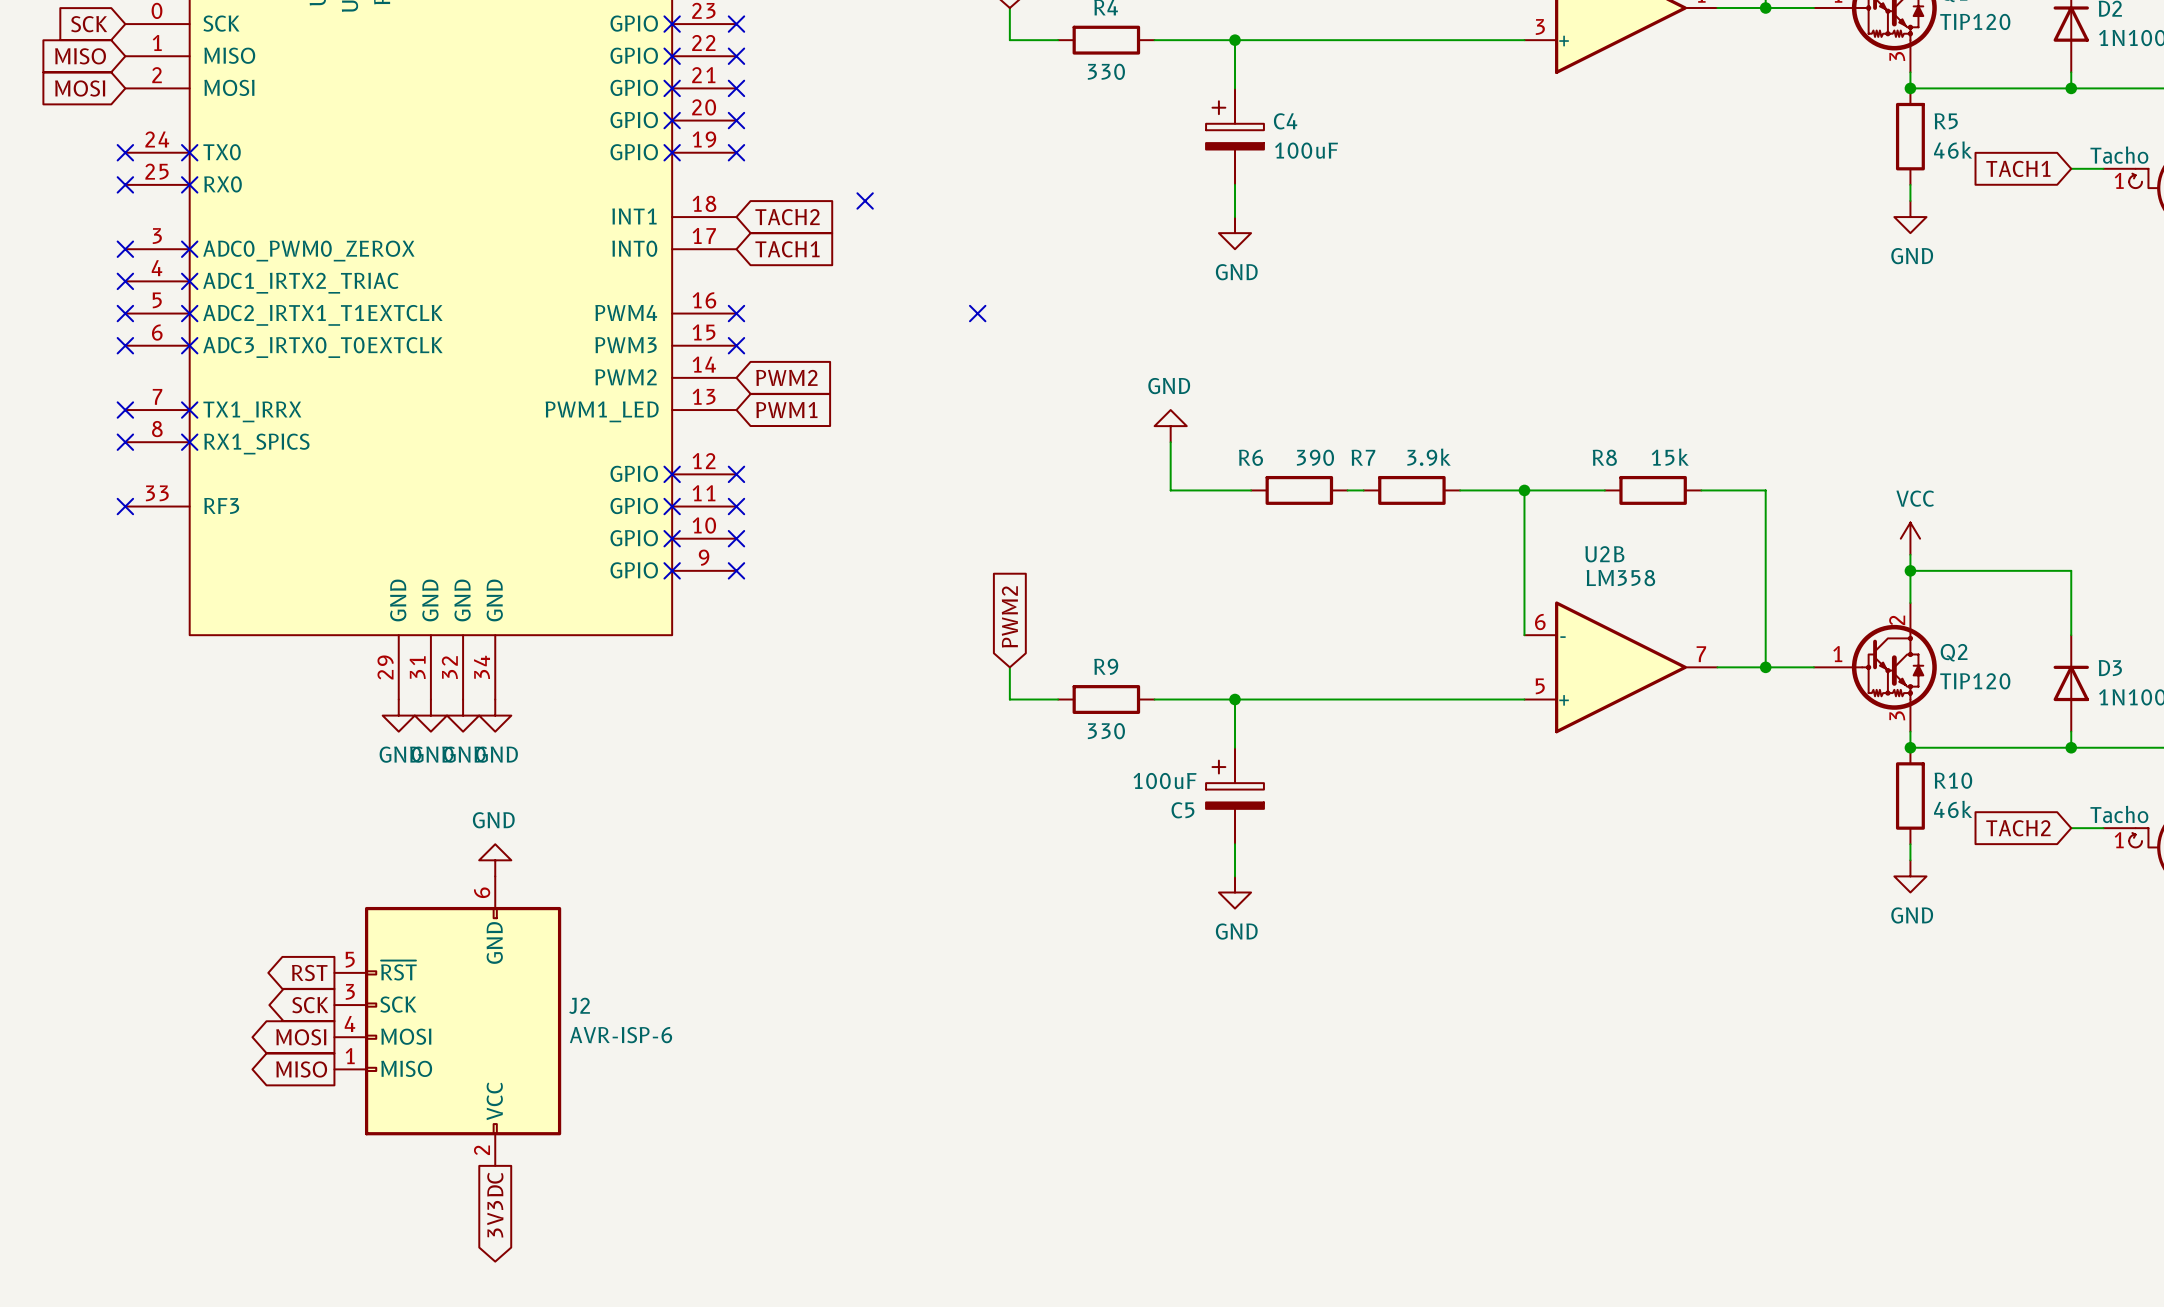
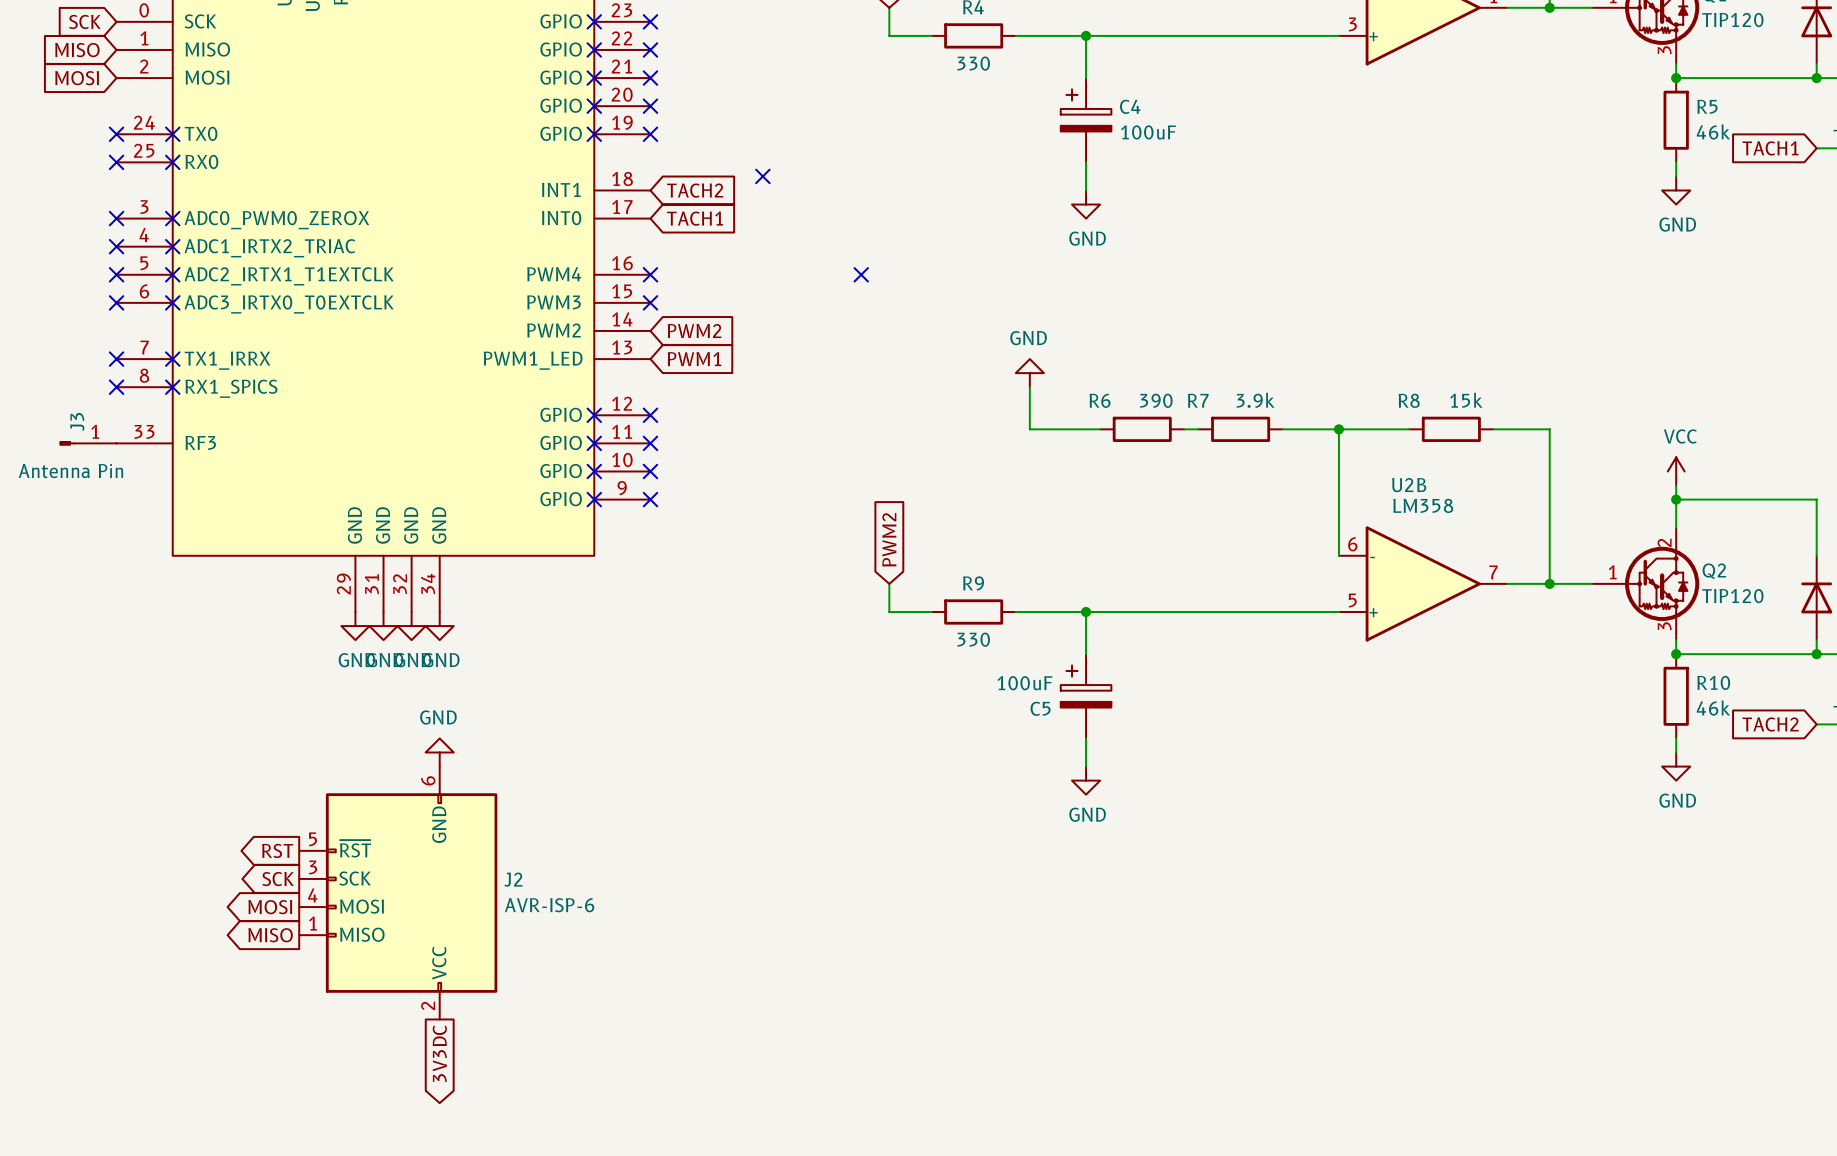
J3: none -> Antenna Pin (88, 443)
no-connect mark: (125, 506) -> none

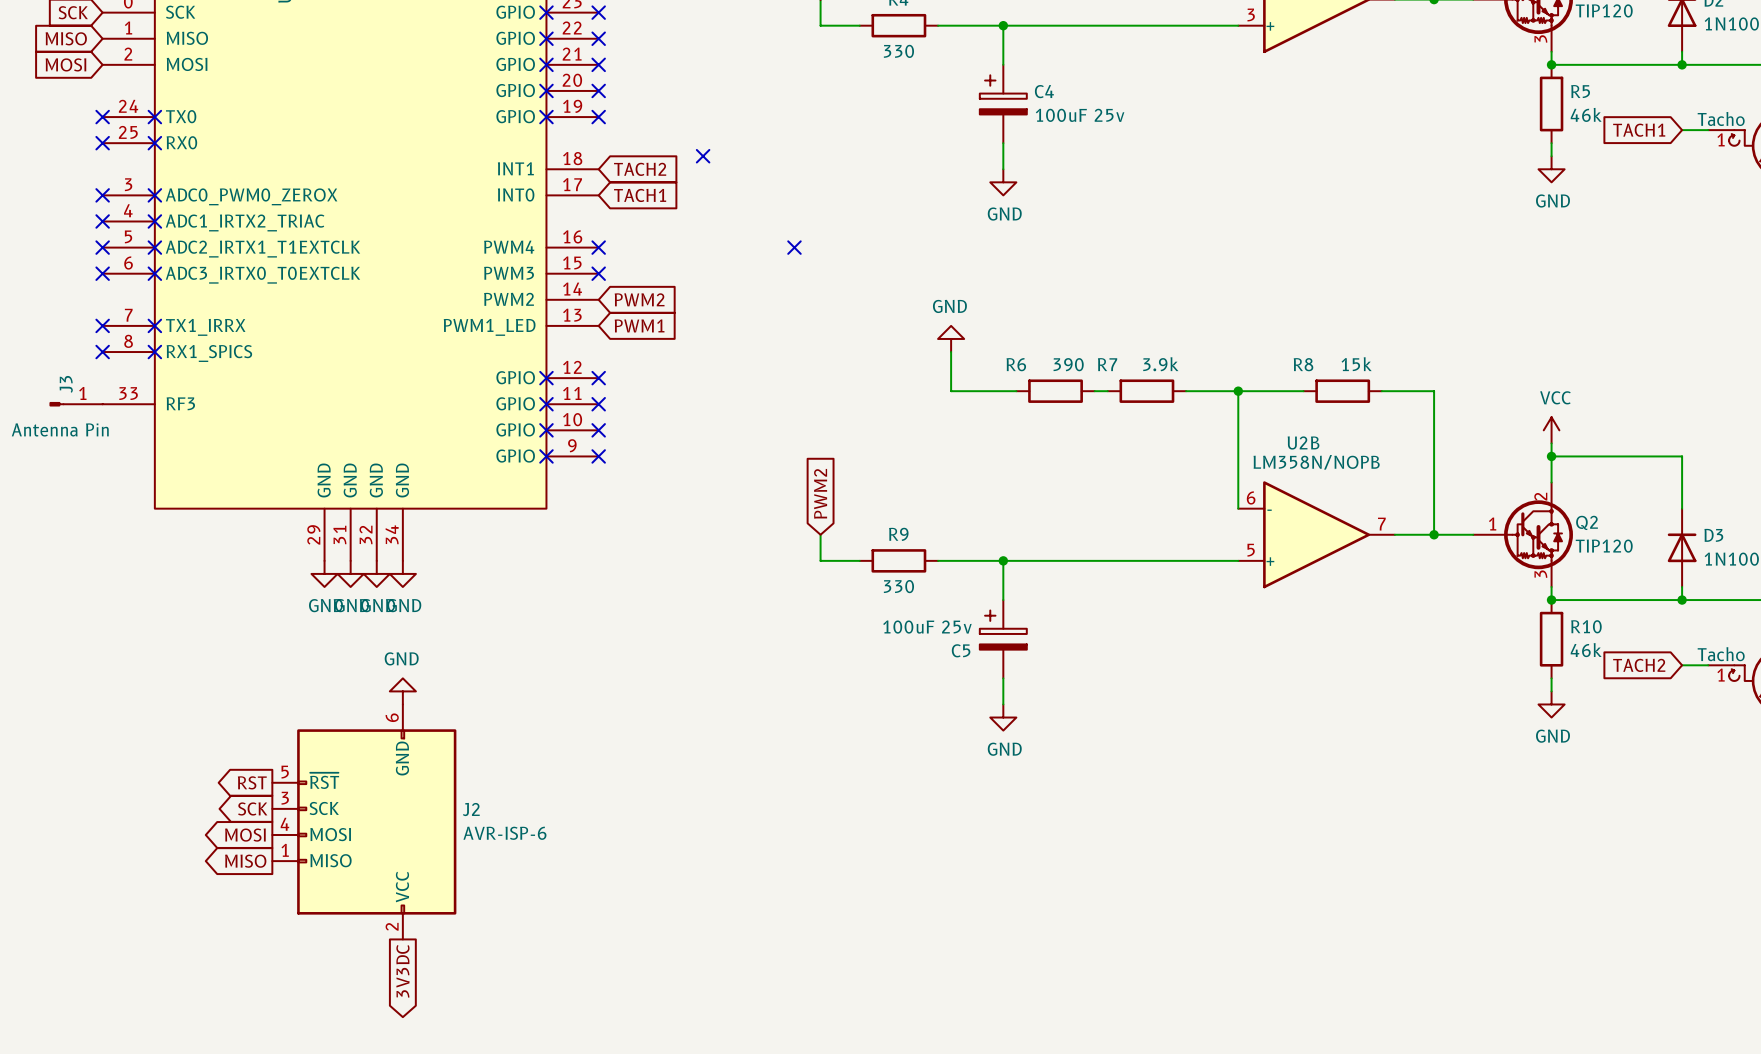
C4 value: 100uF (1148, 132) -> 100uF 25v (1080, 115)
U2B value: LM358 (1423, 505) -> LM358N/NOPB (1316, 462)
C5 value: 100uF (1024, 683) -> 100uF 25v (927, 627)

